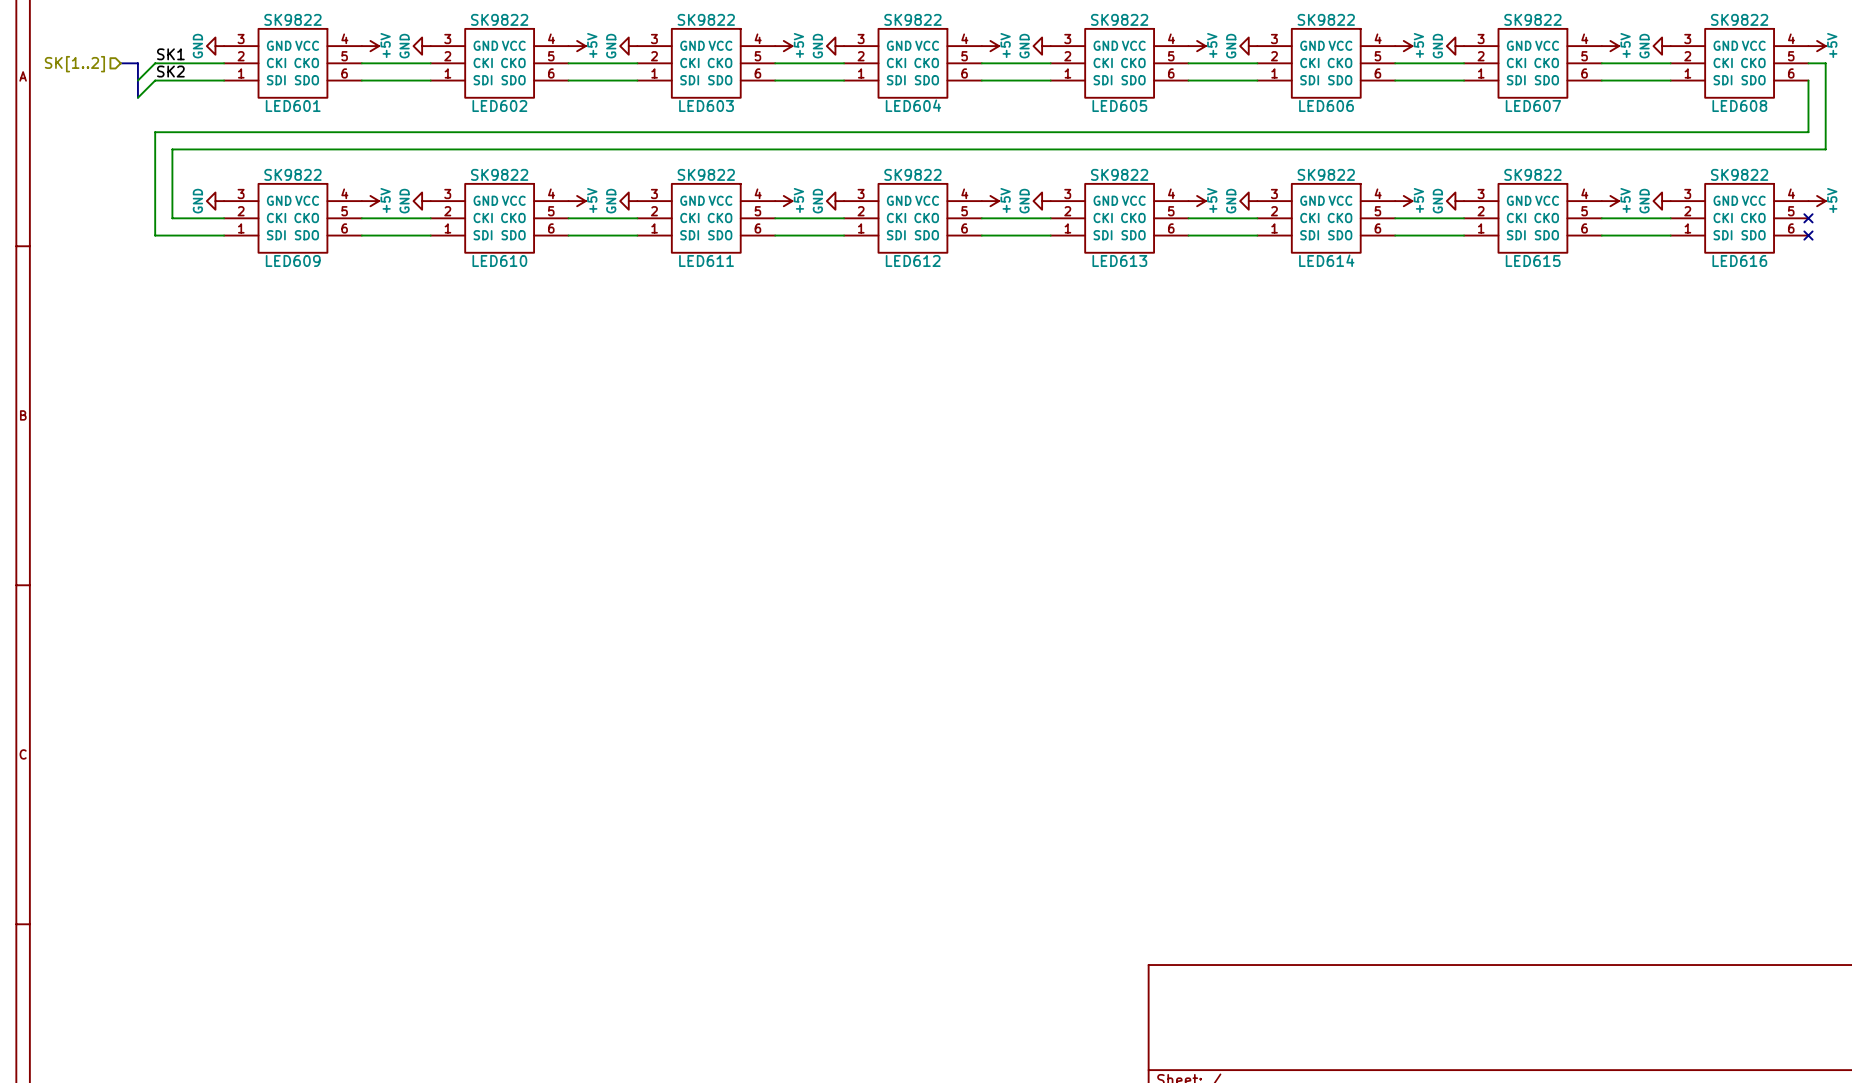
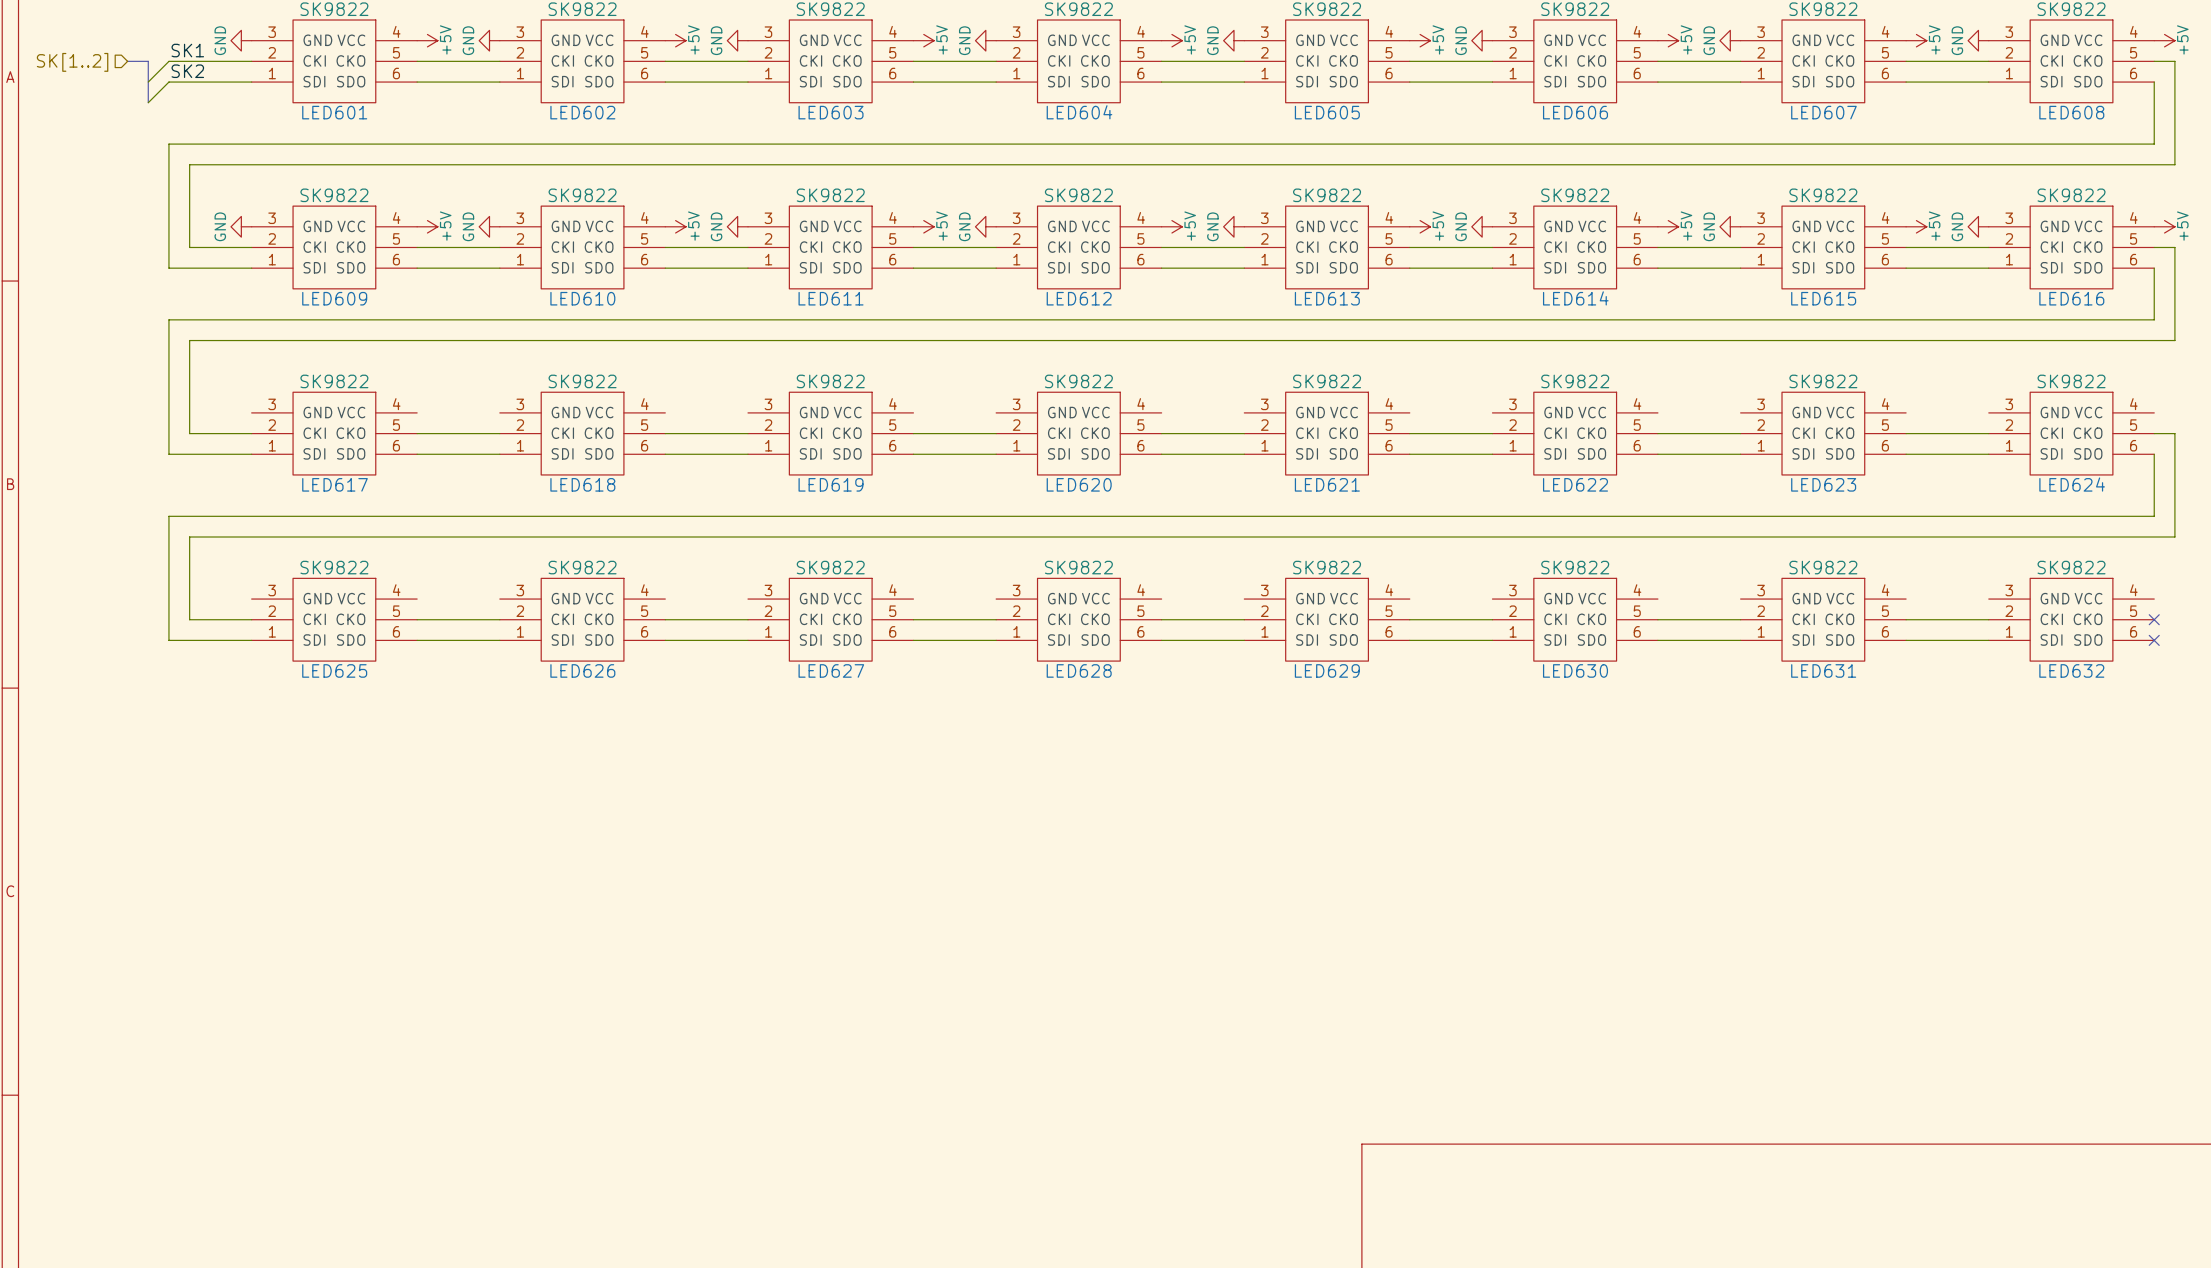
wire: none -> (2154, 247) (2174, 247) (2174, 340) (189, 340) (189, 433) (251, 433)
no-connect mark: (1808, 218) -> none
wire: none -> (2154, 268) (2154, 319) (168, 319) (168, 454) (251, 454)
no-connect mark: (1808, 235) -> none
LED617: none -> SK9822 (334, 433)
wire: none -> (417, 433) (499, 433)
LED618: none -> SK9822 (582, 433)
wire: none -> (665, 433) (748, 433)
LED619: none -> SK9822 (830, 433)
wire: none -> (913, 433) (996, 433)
LED620: none -> SK9822 (1078, 433)
wire: none -> (1161, 433) (1244, 433)
LED621: none -> SK9822 (1327, 433)
wire: none -> (1409, 433) (1492, 433)
LED622: none -> SK9822 (1575, 433)
wire: none -> (1657, 433) (1740, 433)
LED623: none -> SK9822 (1823, 433)
wire: none -> (1906, 433) (1988, 433)
LED624: none -> SK9822 (2071, 433)
wire: none -> (2154, 433) (2174, 433) (2174, 537) (189, 537) (189, 619) (251, 619)
wire: none -> (417, 454) (499, 454)
wire: none -> (665, 454) (748, 454)
wire: none -> (913, 454) (996, 454)
wire: none -> (1161, 454) (1244, 454)
wire: none -> (1409, 454) (1492, 454)
wire: none -> (1657, 454) (1740, 454)
wire: none -> (1906, 454) (1988, 454)
wire: none -> (2154, 454) (2154, 516) (168, 516) (168, 640) (251, 640)
LED625: none -> SK9822 (334, 619)
wire: none -> (417, 619) (499, 619)
LED626: none -> SK9822 (582, 619)
wire: none -> (665, 619) (748, 619)
LED627: none -> SK9822 (830, 619)
wire: none -> (913, 619) (996, 619)
LED628: none -> SK9822 (1078, 619)
wire: none -> (1161, 619) (1244, 619)
LED629: none -> SK9822 (1327, 619)
wire: none -> (1409, 619) (1492, 619)
LED630: none -> SK9822 (1575, 619)
wire: none -> (1657, 619) (1740, 619)
LED631: none -> SK9822 (1823, 619)
wire: none -> (1906, 619) (1988, 619)
LED632: none -> SK9822 (2071, 619)
no-connect mark: none -> (2154, 619)
wire: none -> (417, 640) (499, 640)
wire: none -> (665, 640) (748, 640)
wire: none -> (913, 640) (996, 640)
wire: none -> (1161, 640) (1244, 640)
wire: none -> (1409, 640) (1492, 640)
wire: none -> (1657, 640) (1740, 640)
wire: none -> (1906, 640) (1988, 640)
no-connect mark: none -> (2154, 640)

